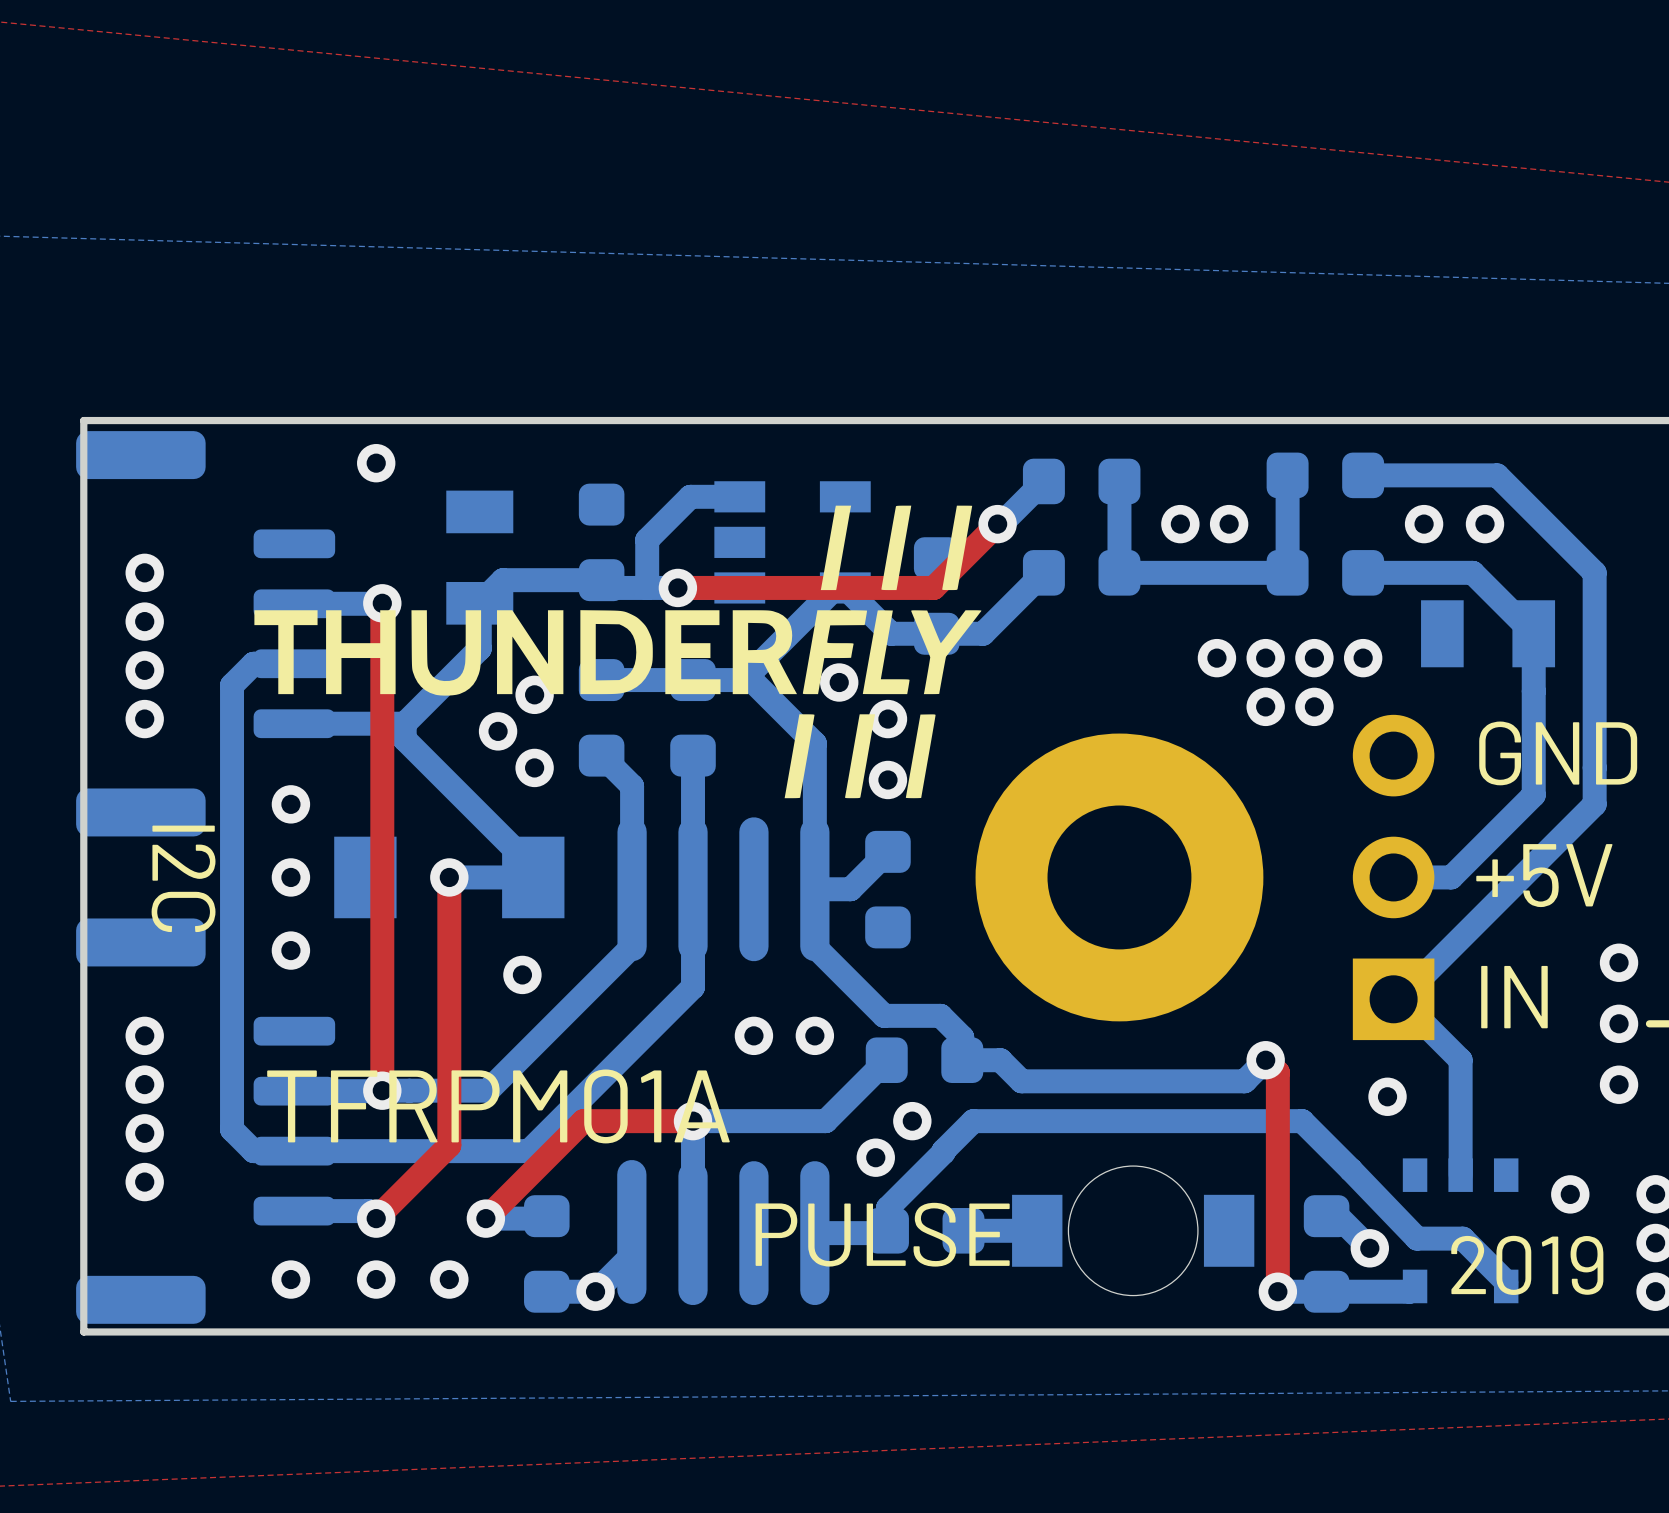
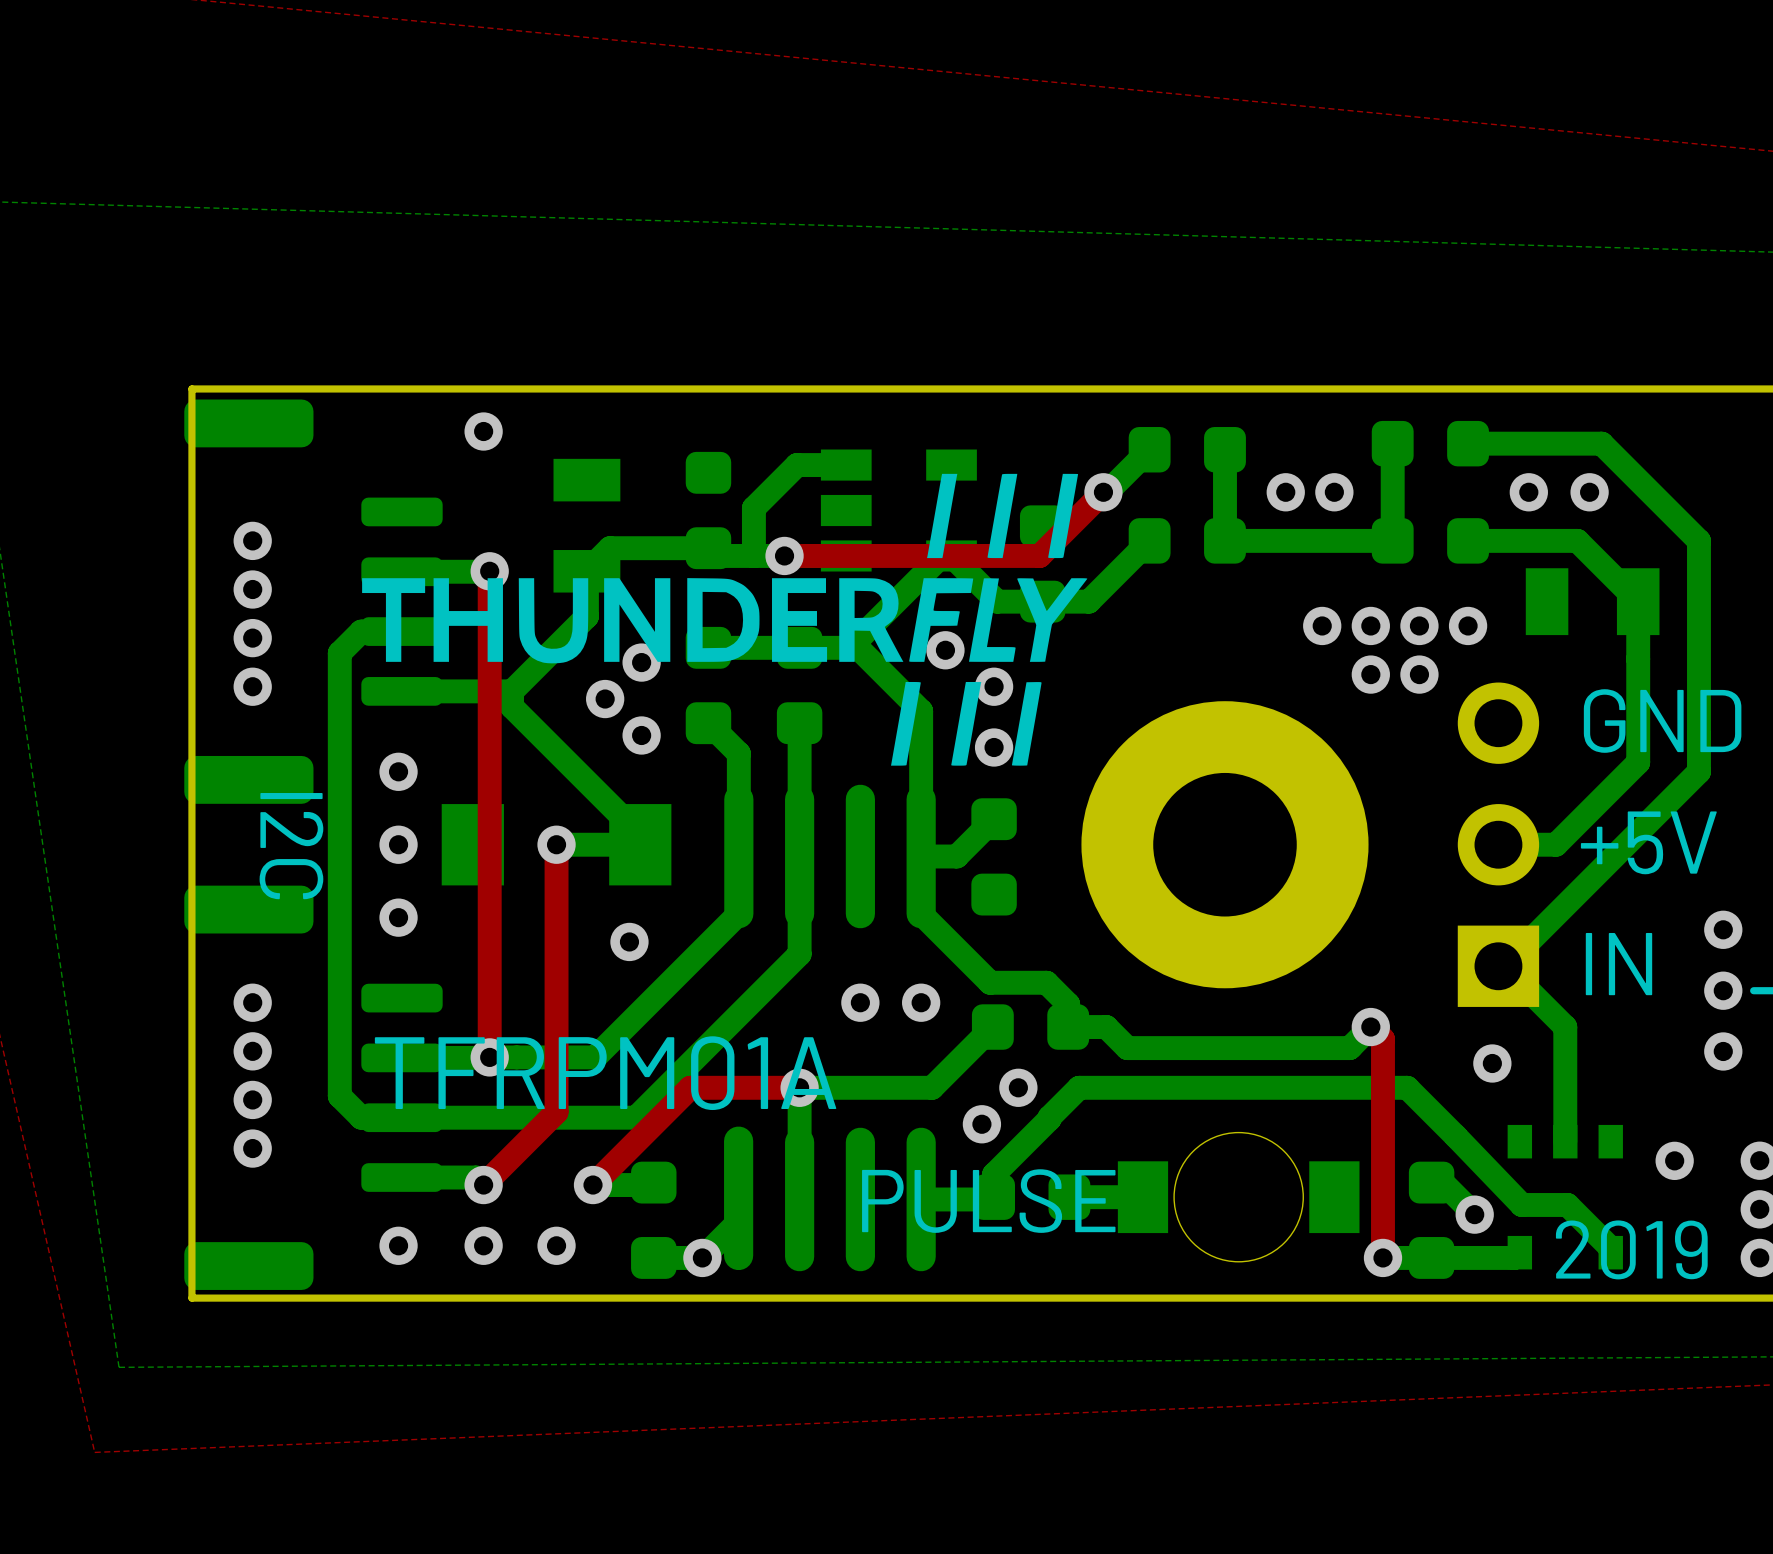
text position: 2019 (1527, 1265) -> 2019 (1631, 1249)

